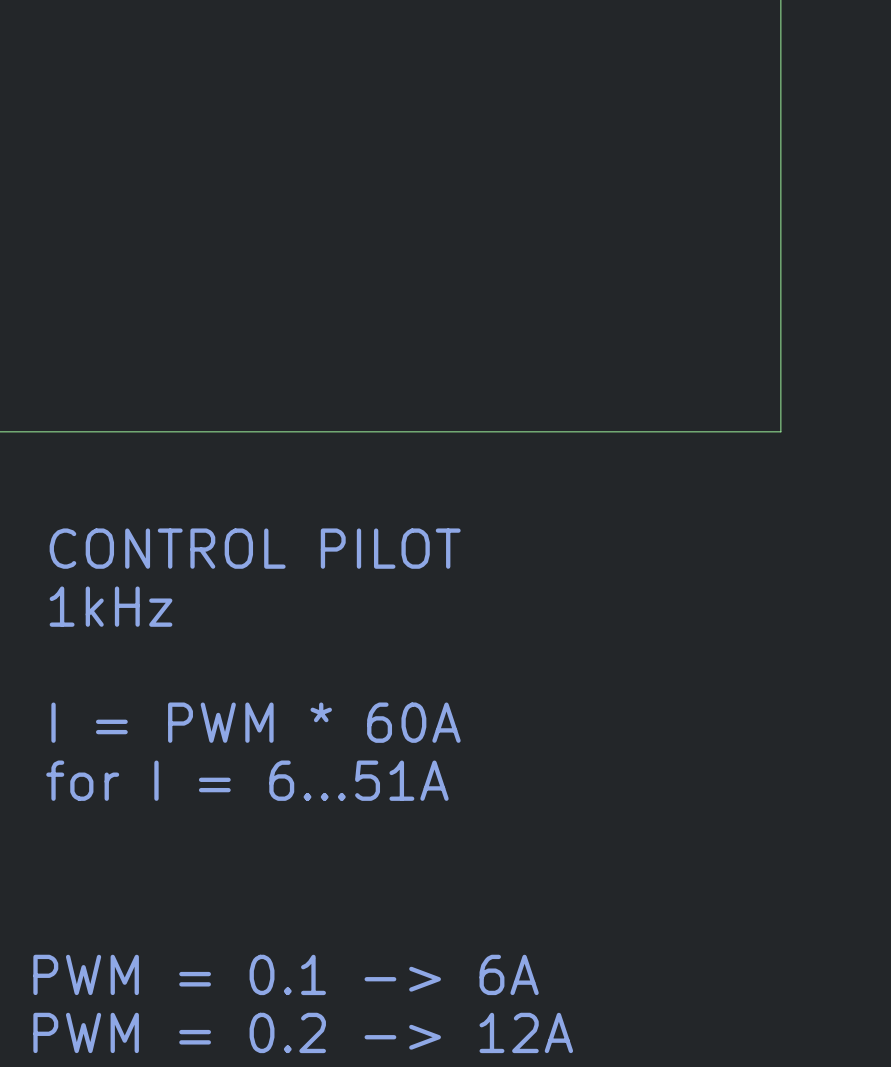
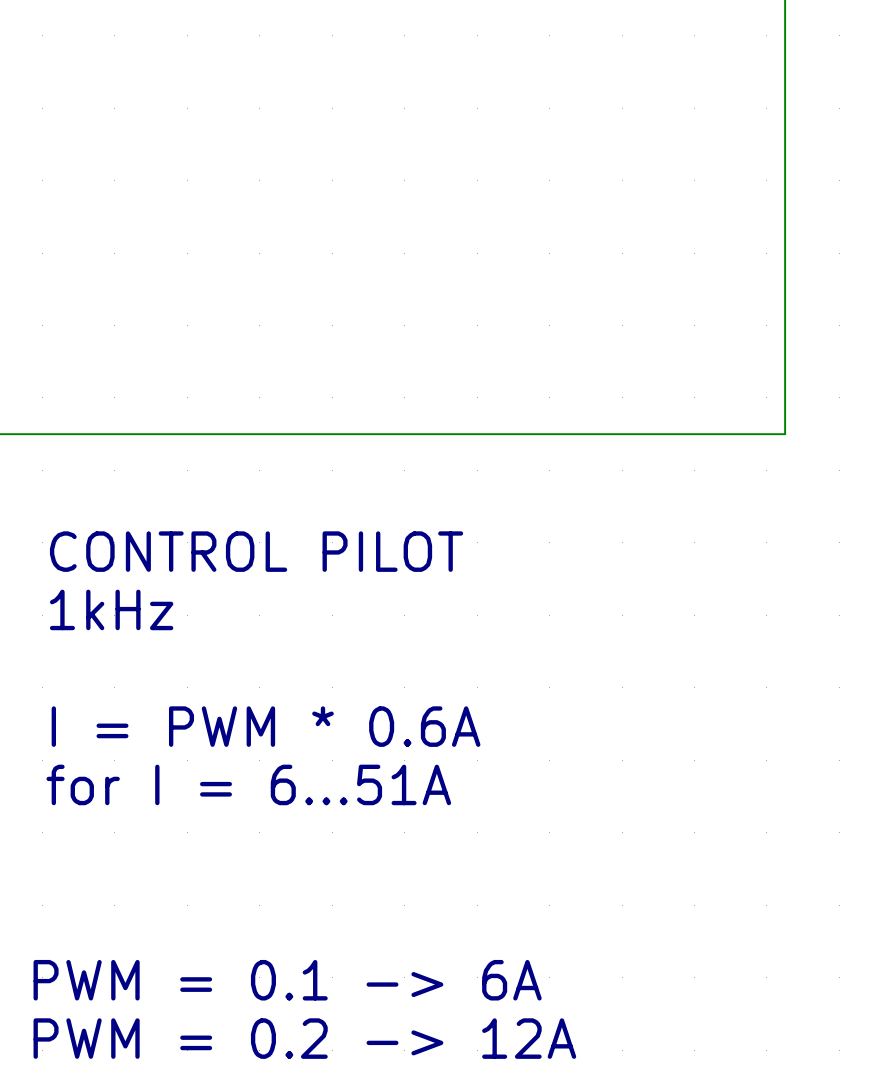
text: I = PWM * 60A (256, 722) -> I = PWM * 0.6A (266, 726)

